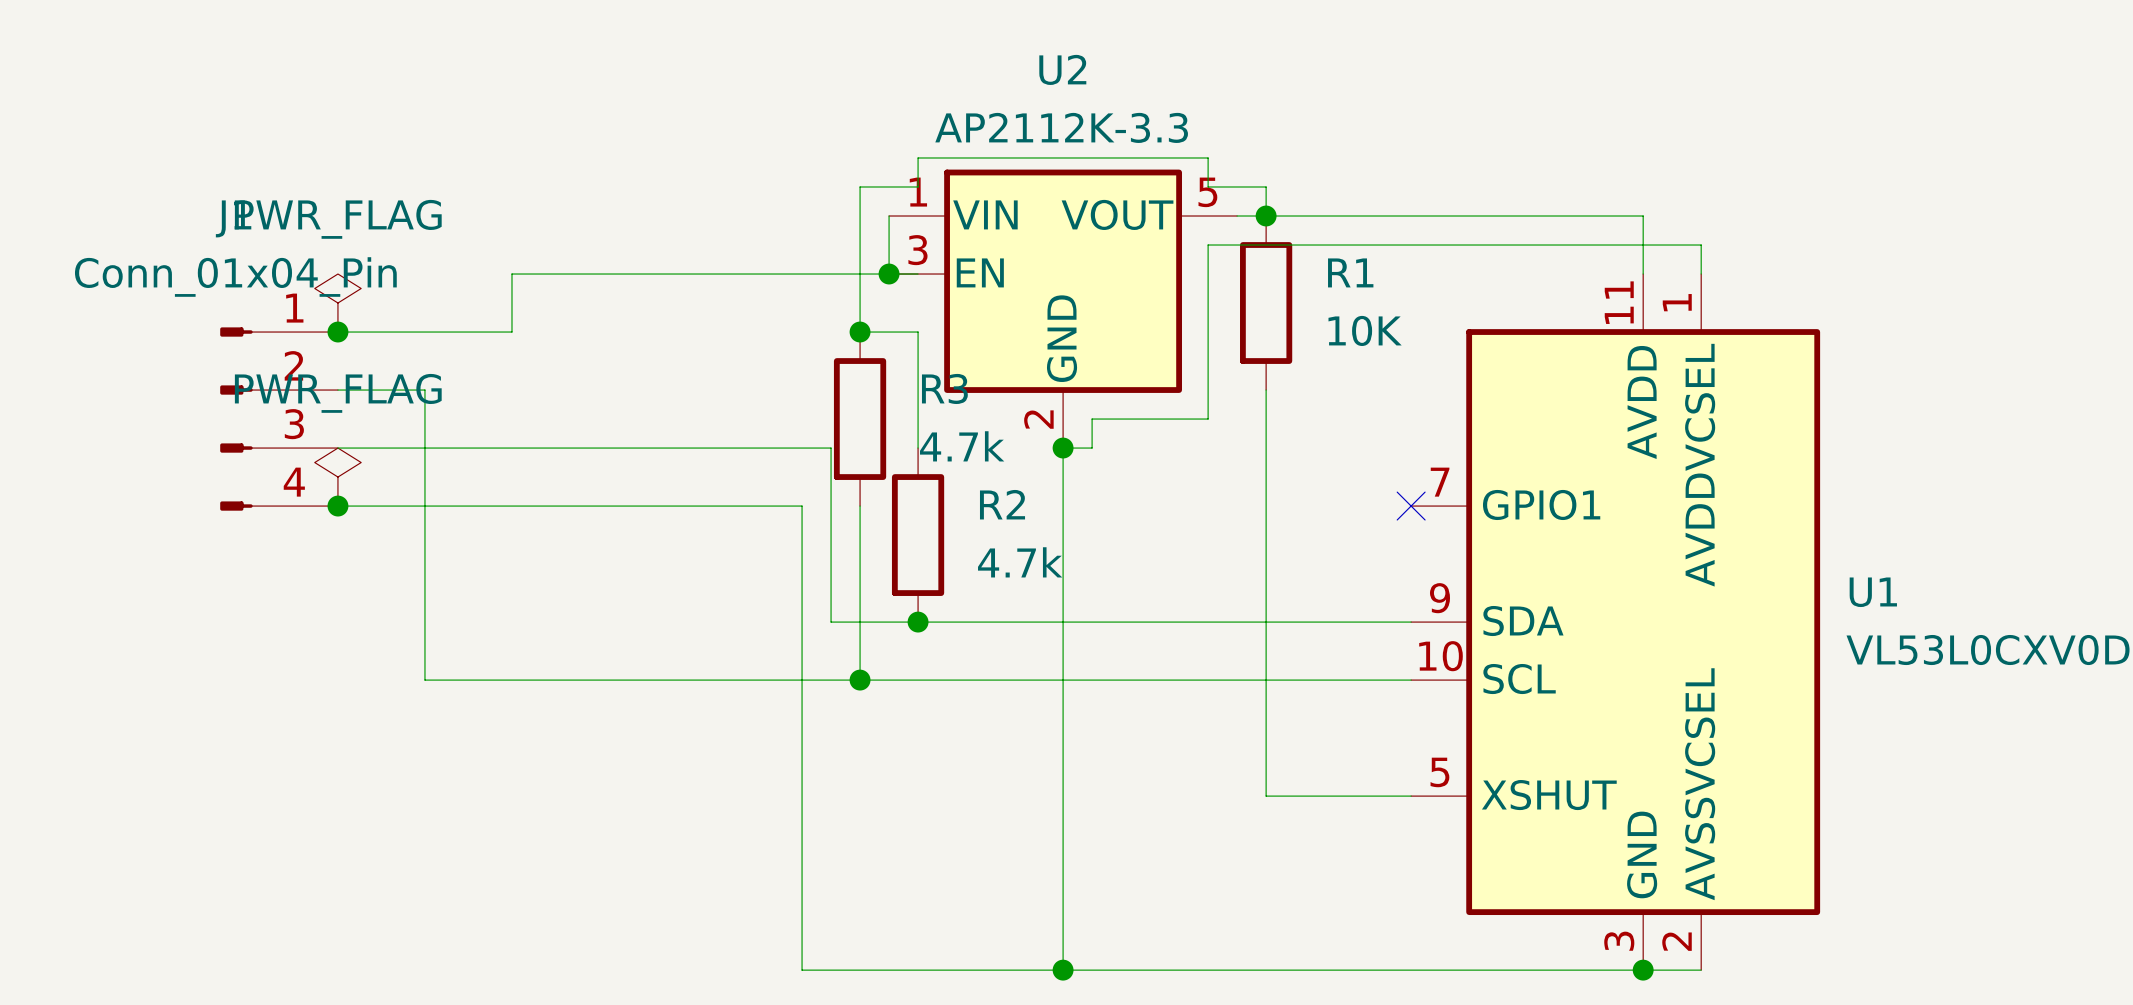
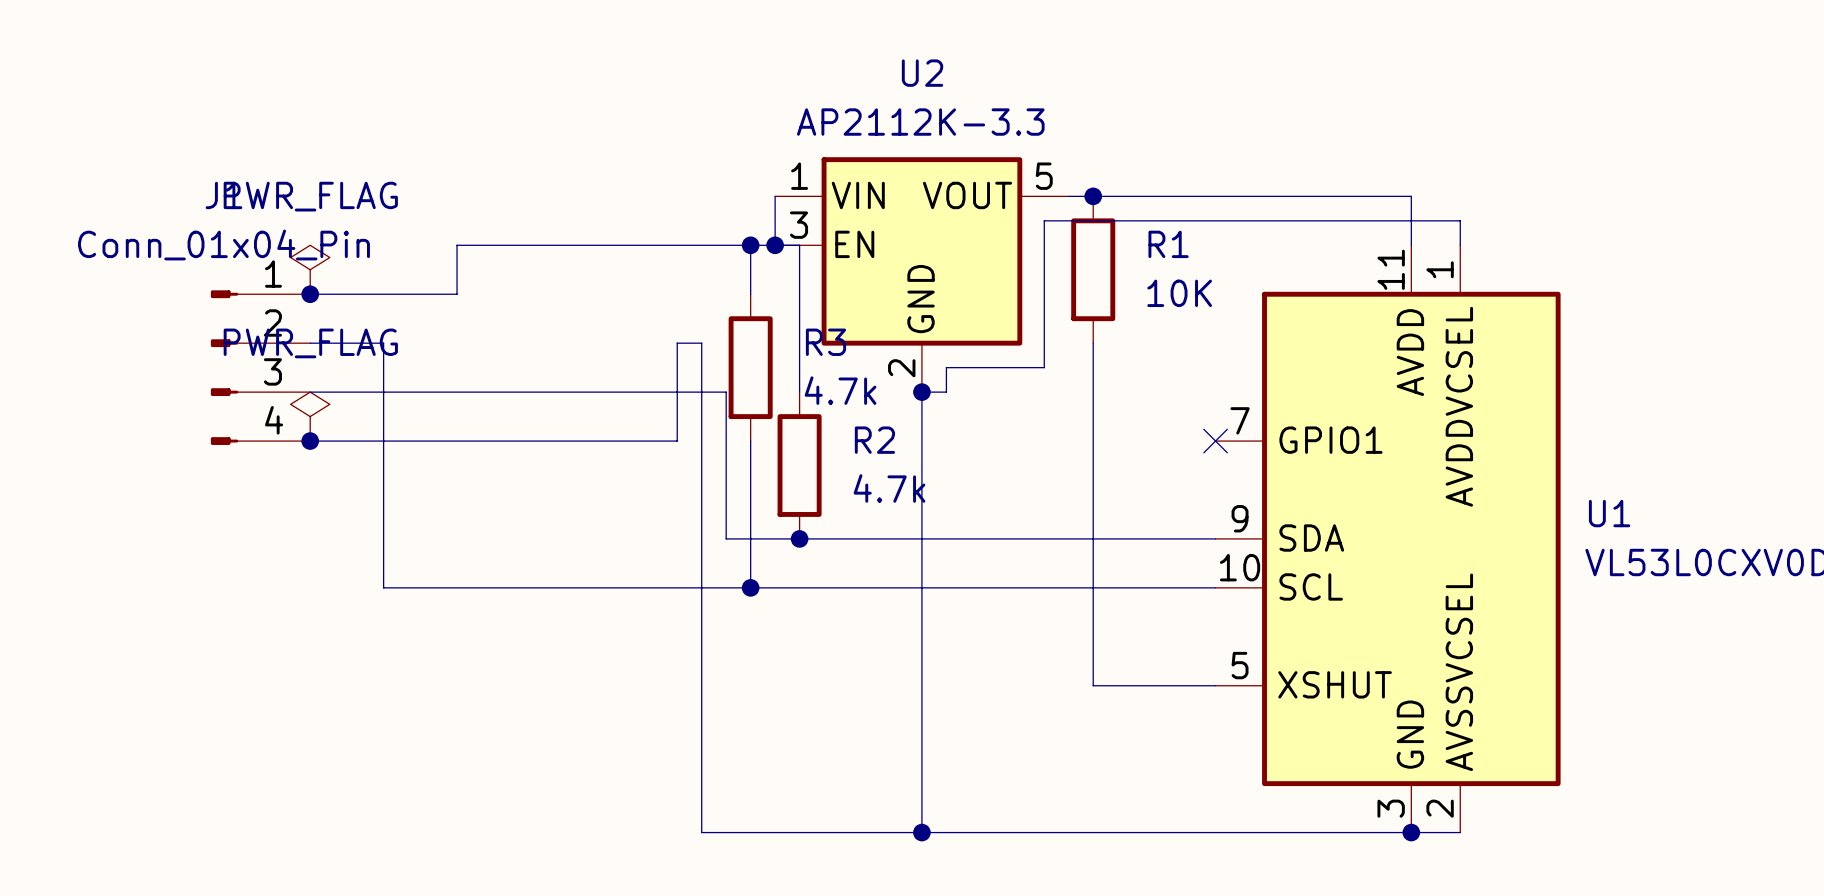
wire: (1266, 216) (1266, 186) (1208, 186) (1208, 157) (918, 157) (918, 186) (860, 186) (860, 274) -> none
wire: (860, 332) (918, 332) -> (799, 245) (799, 294)
junction position: (860, 332) -> (750, 245)
wire: (773, 506) (802, 506) -> (677, 441) (677, 343) (701, 343) (701, 441)

